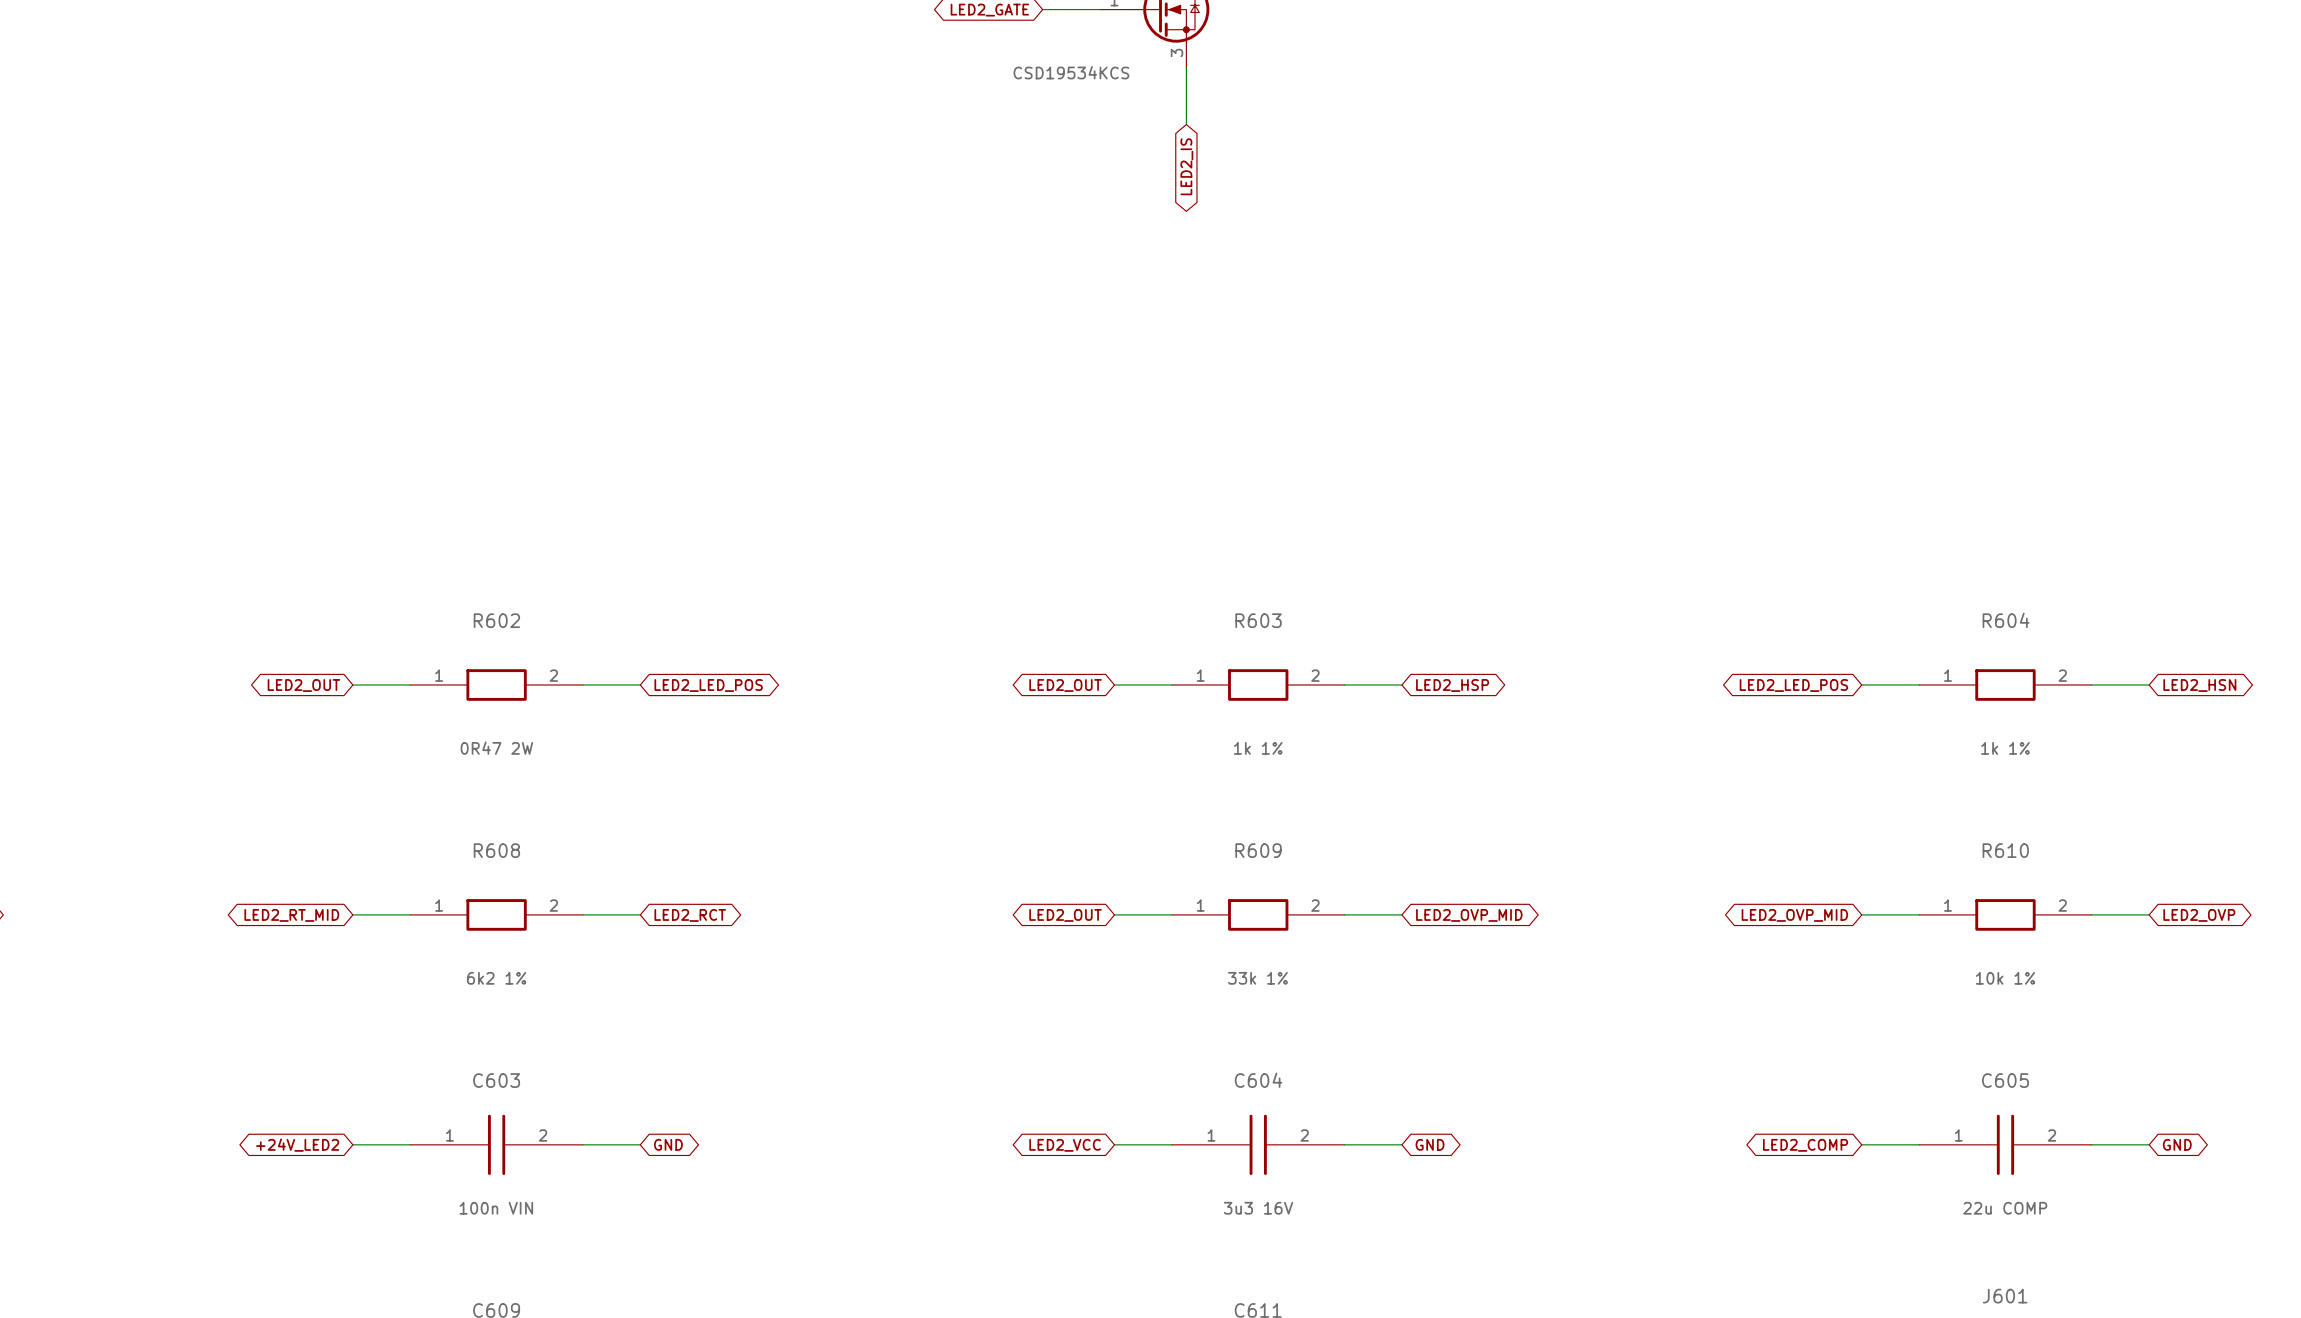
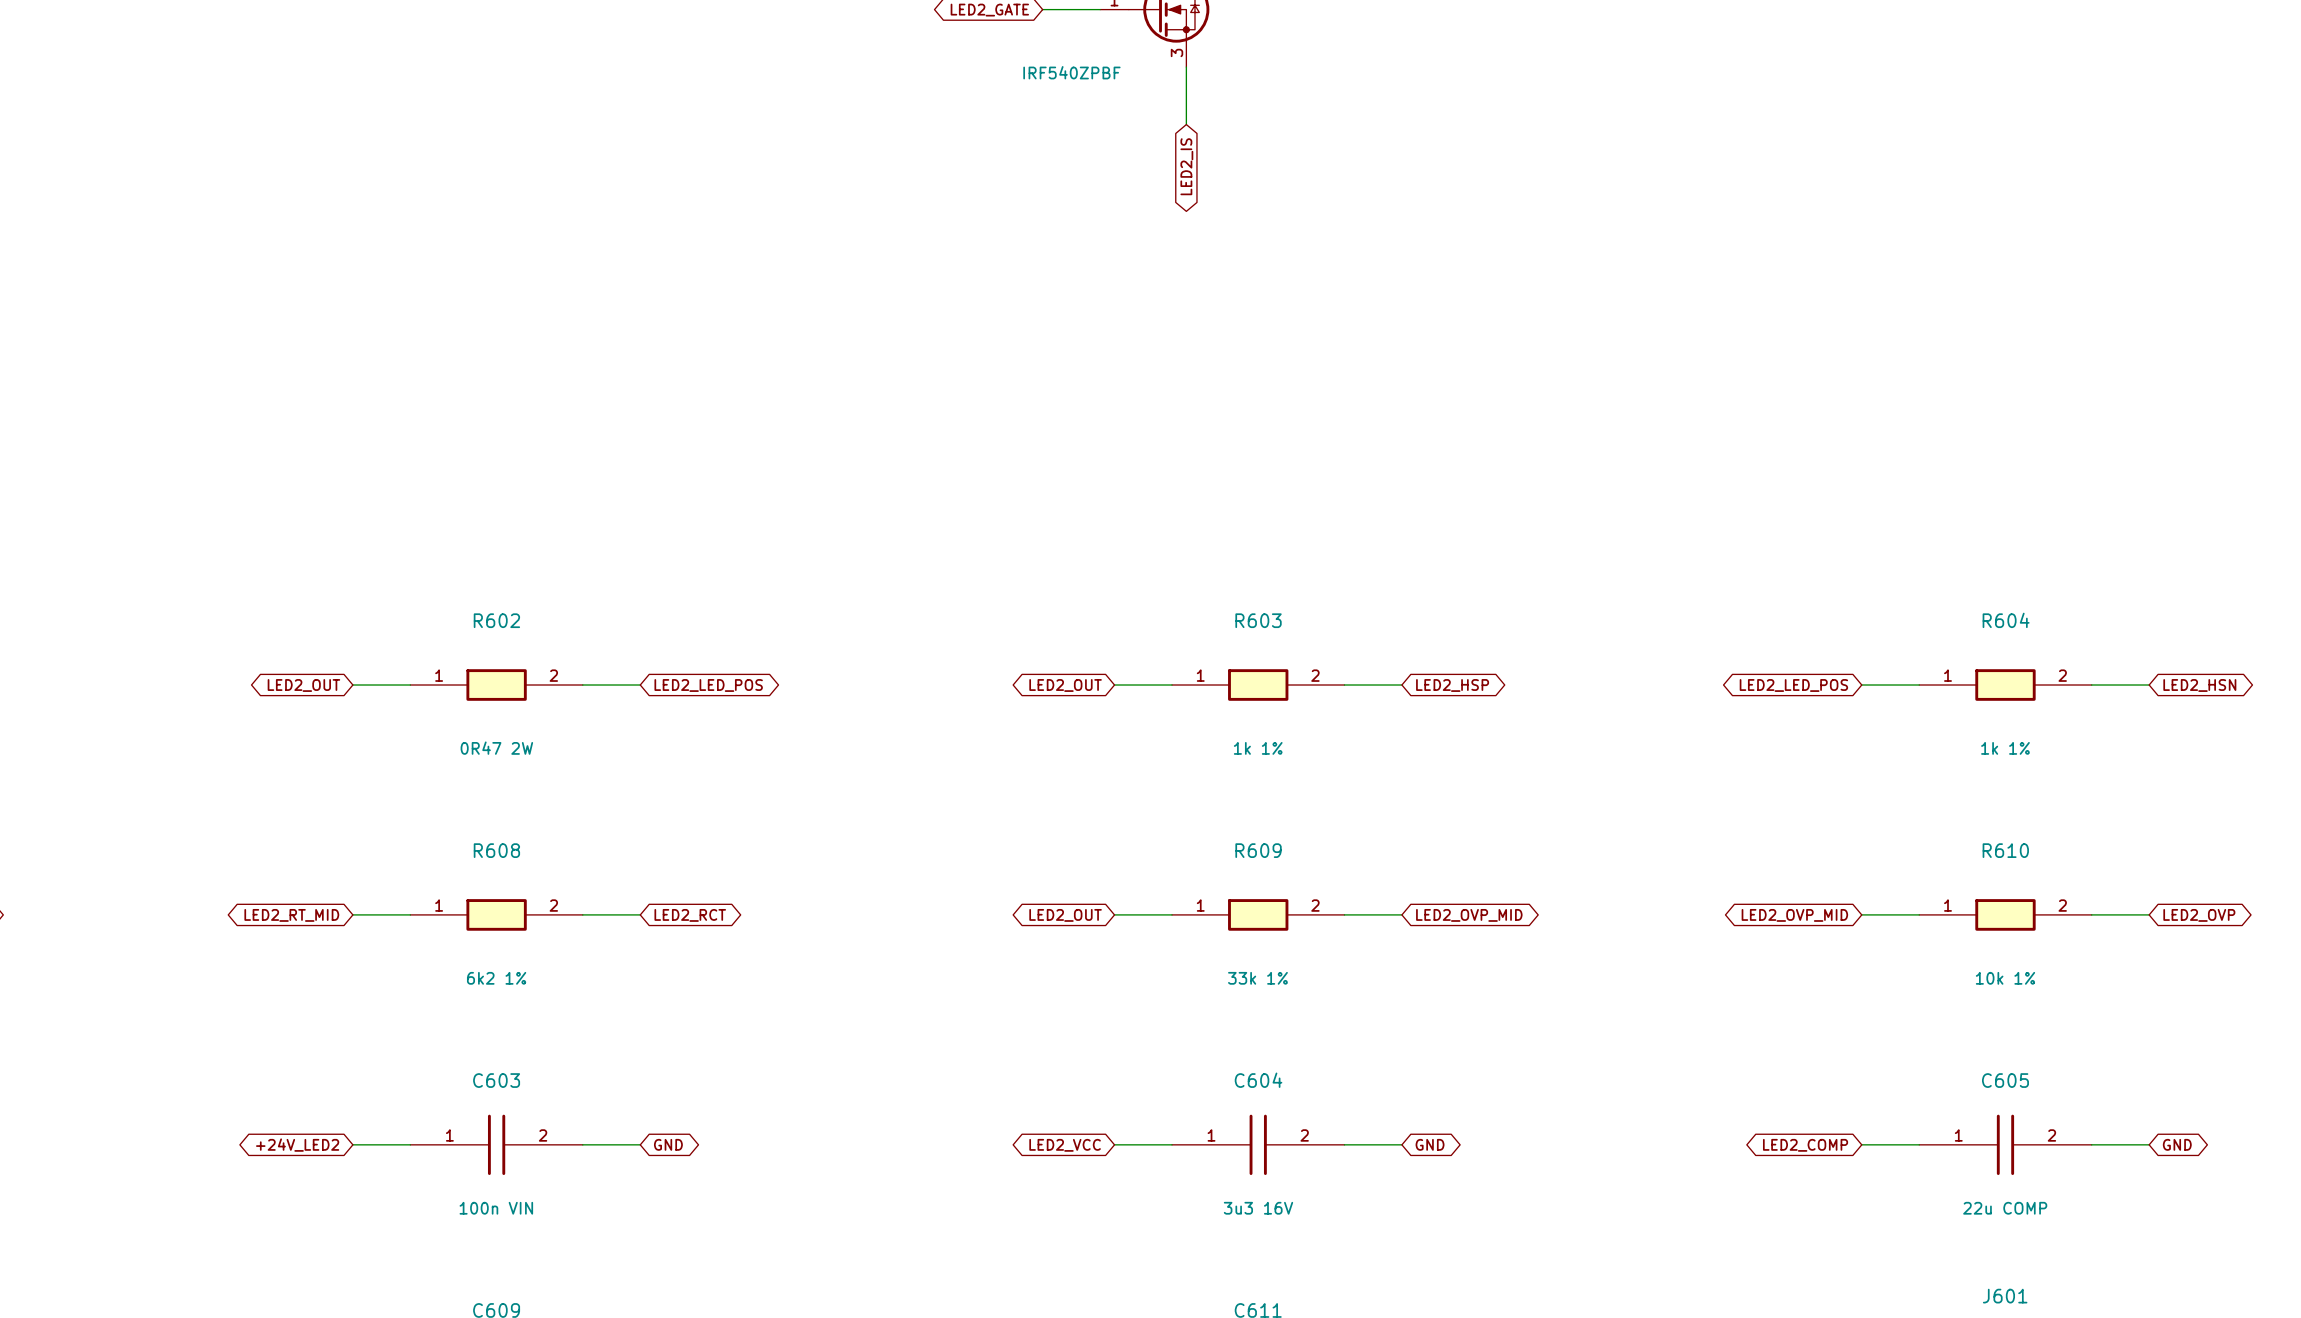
part value: CSD19534KCS (1071, 72) -> IRF540ZPBF (1071, 72)

